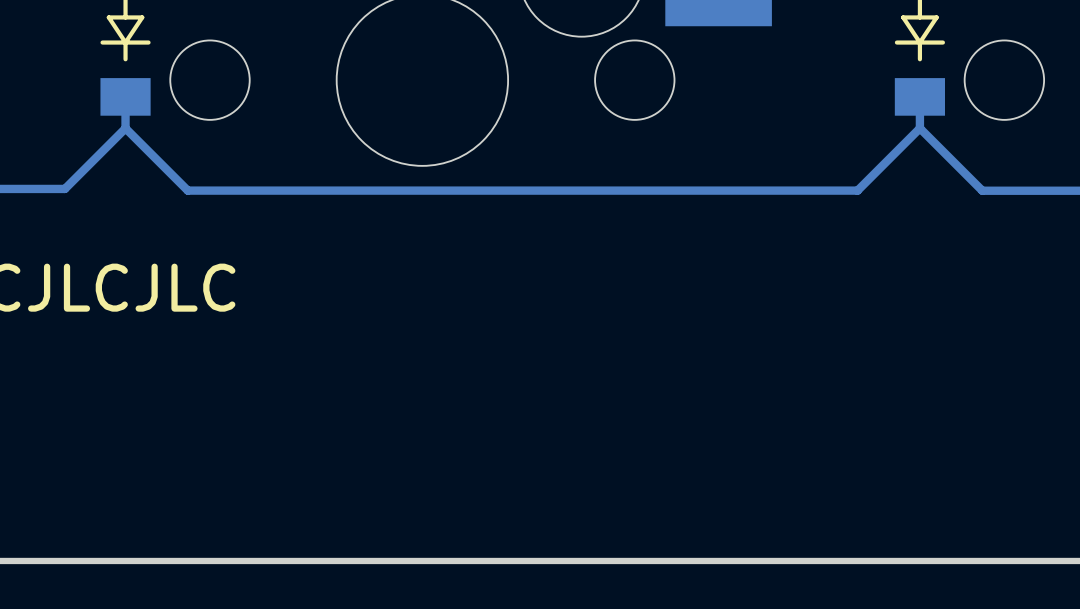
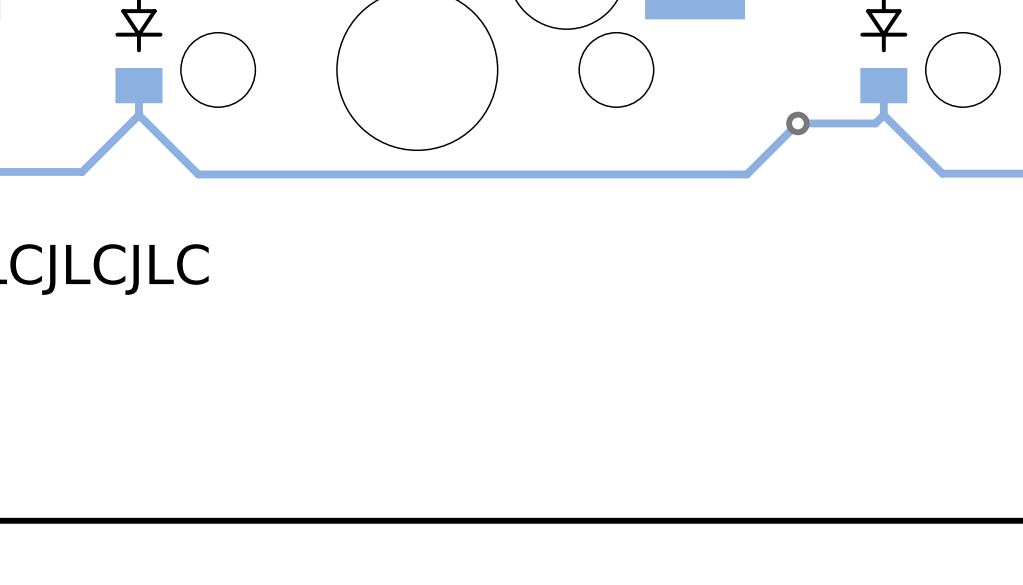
via: none -> (797, 123)
track: (911, 137) (857, 190) (187, 190) -> (875, 123) (797, 123) (746, 174) (197, 173)

